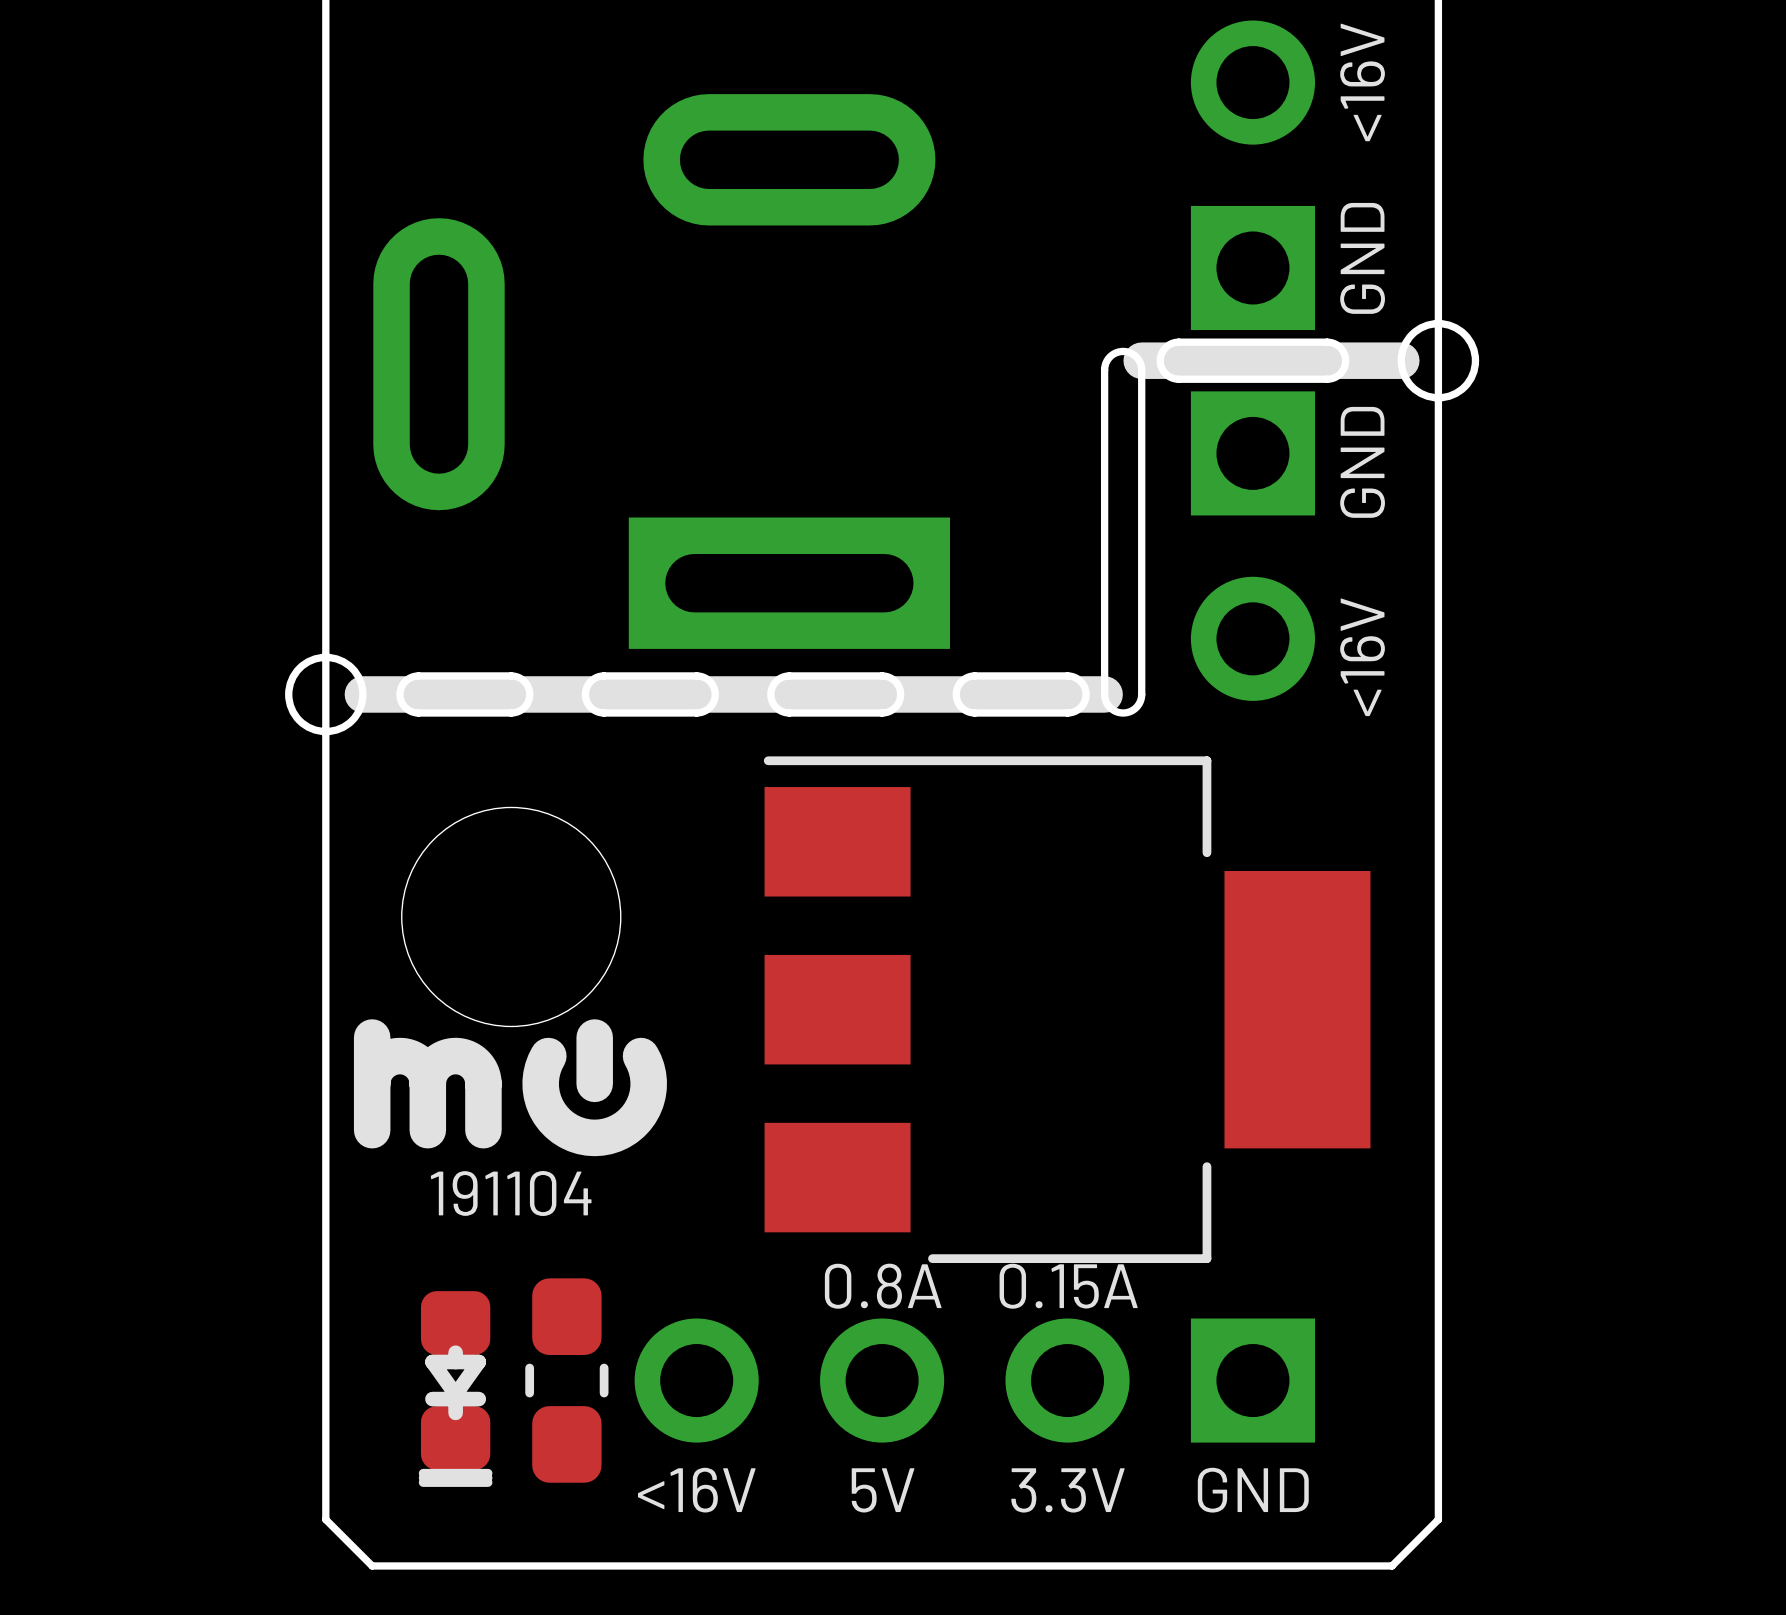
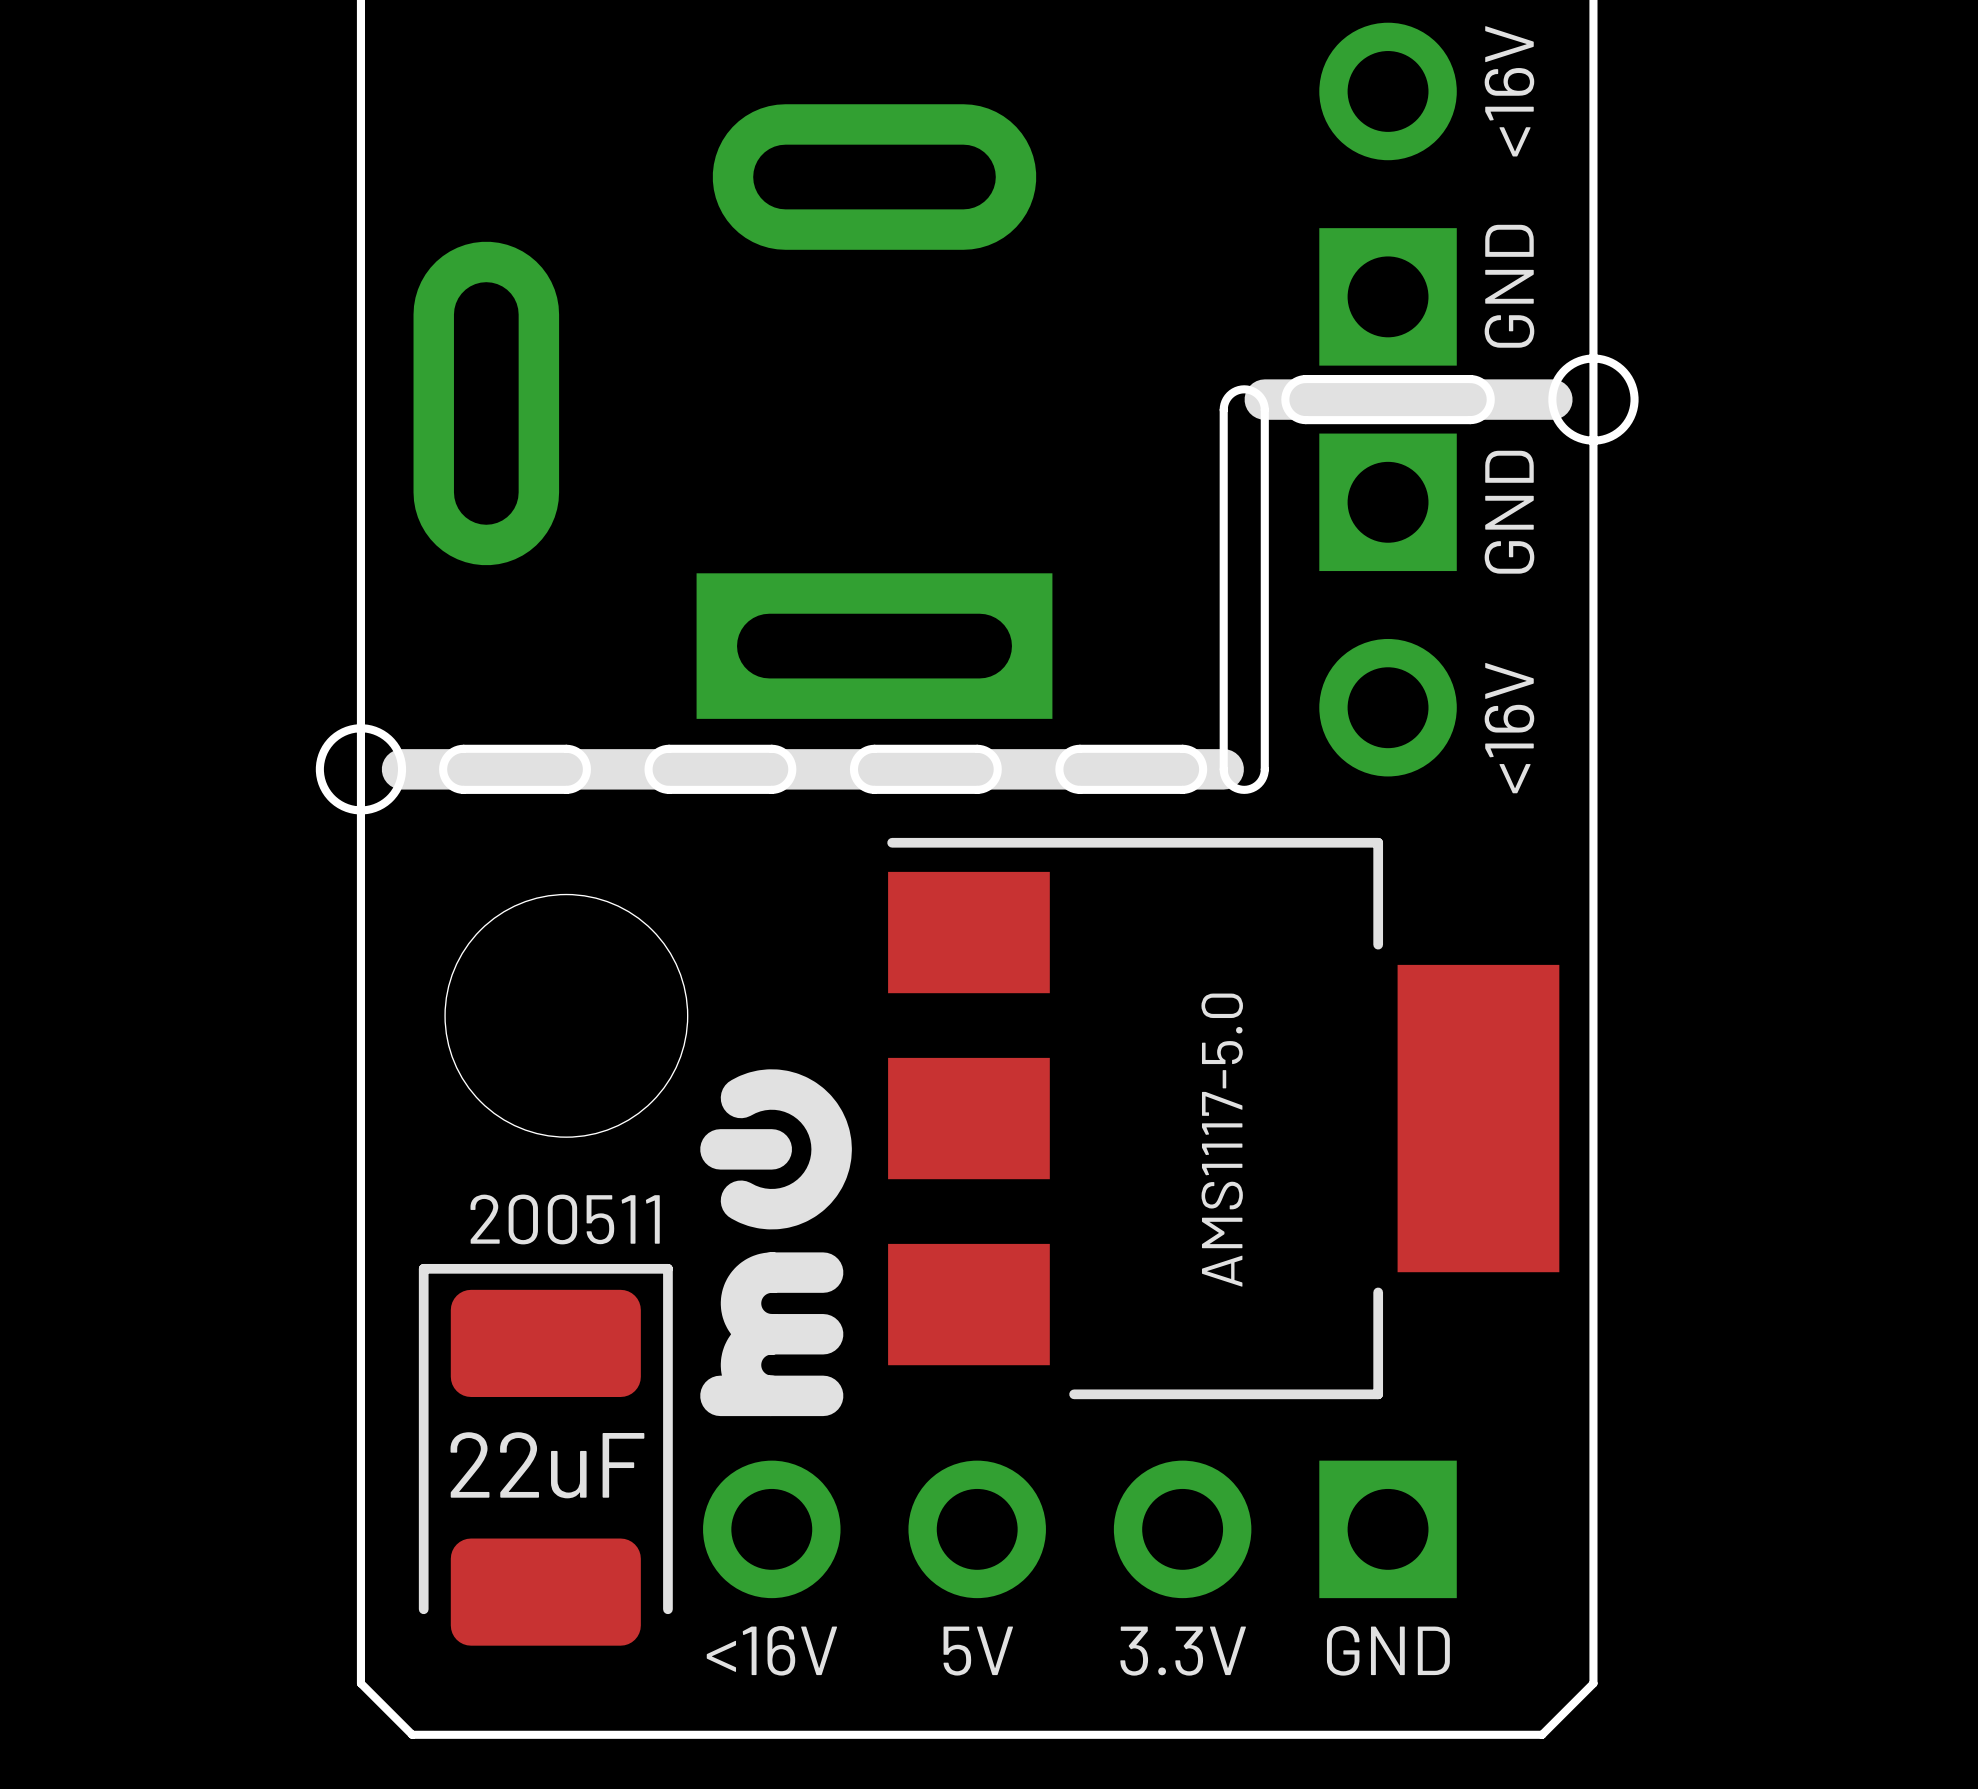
drawing: none -> [700, 1069, 852, 1417]
part position: (1067, 1009) -> (1223, 1118)
drawing: [353, 1019, 667, 1157] -> none
part value: none -> AMS1117-5.0 (1222, 1140)
text: none -> 200511 (565, 1219)
text: 191104 (511, 1193) -> none
text: 0.8A (883, 1286) -> none
text: 0.15A (1068, 1286) -> none
part: none -> 22uF (545, 1454)
part: (566, 1380) -> none
part: (455, 1389) -> none

